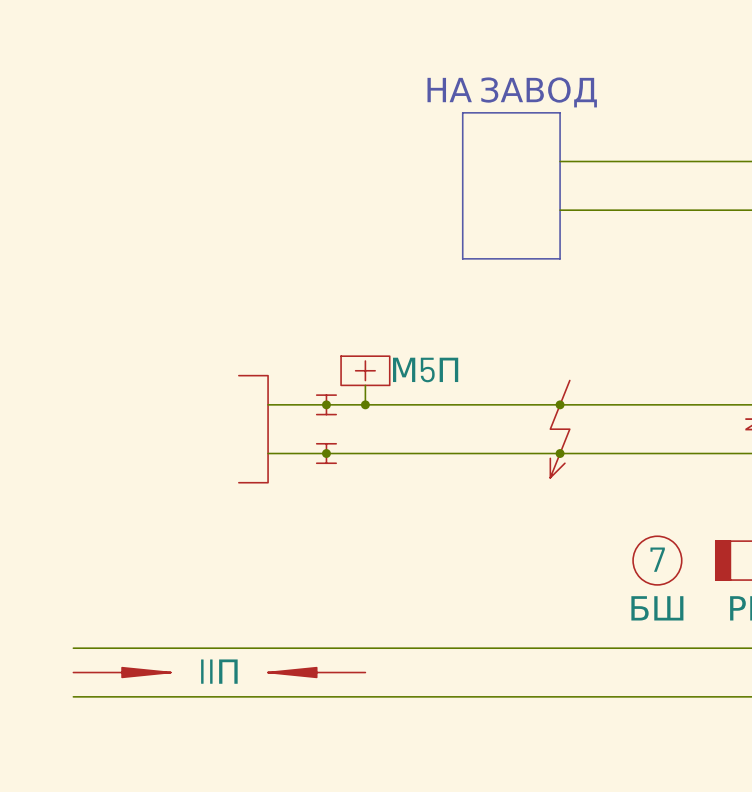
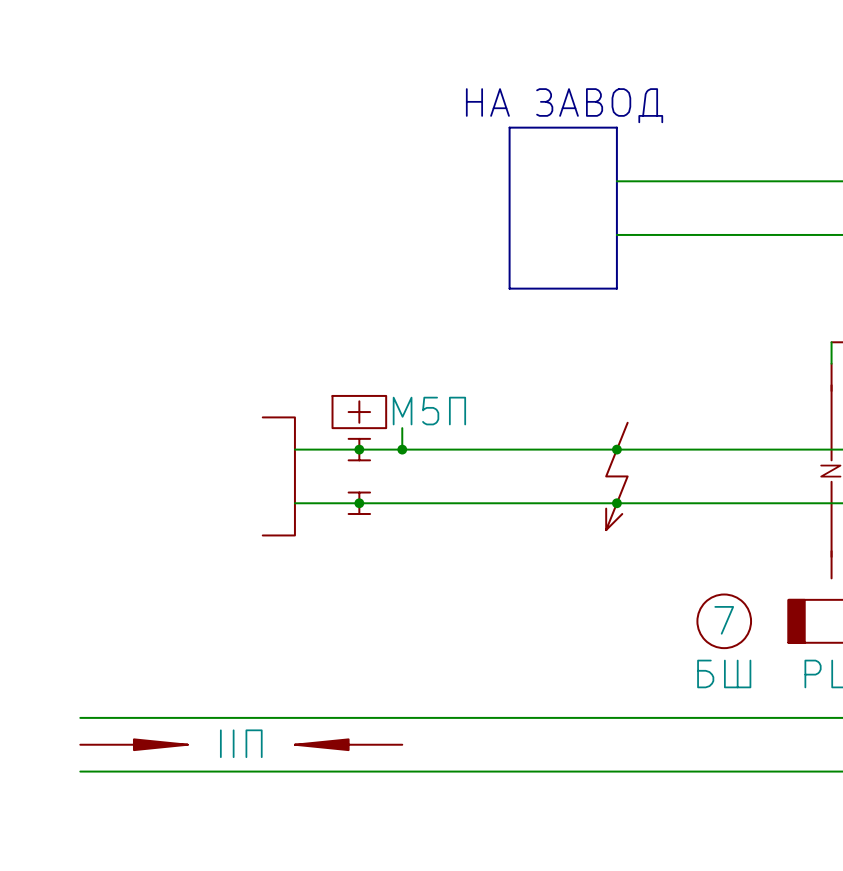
power symbol: none -> (359, 412)
part: (365, 370) -> none

